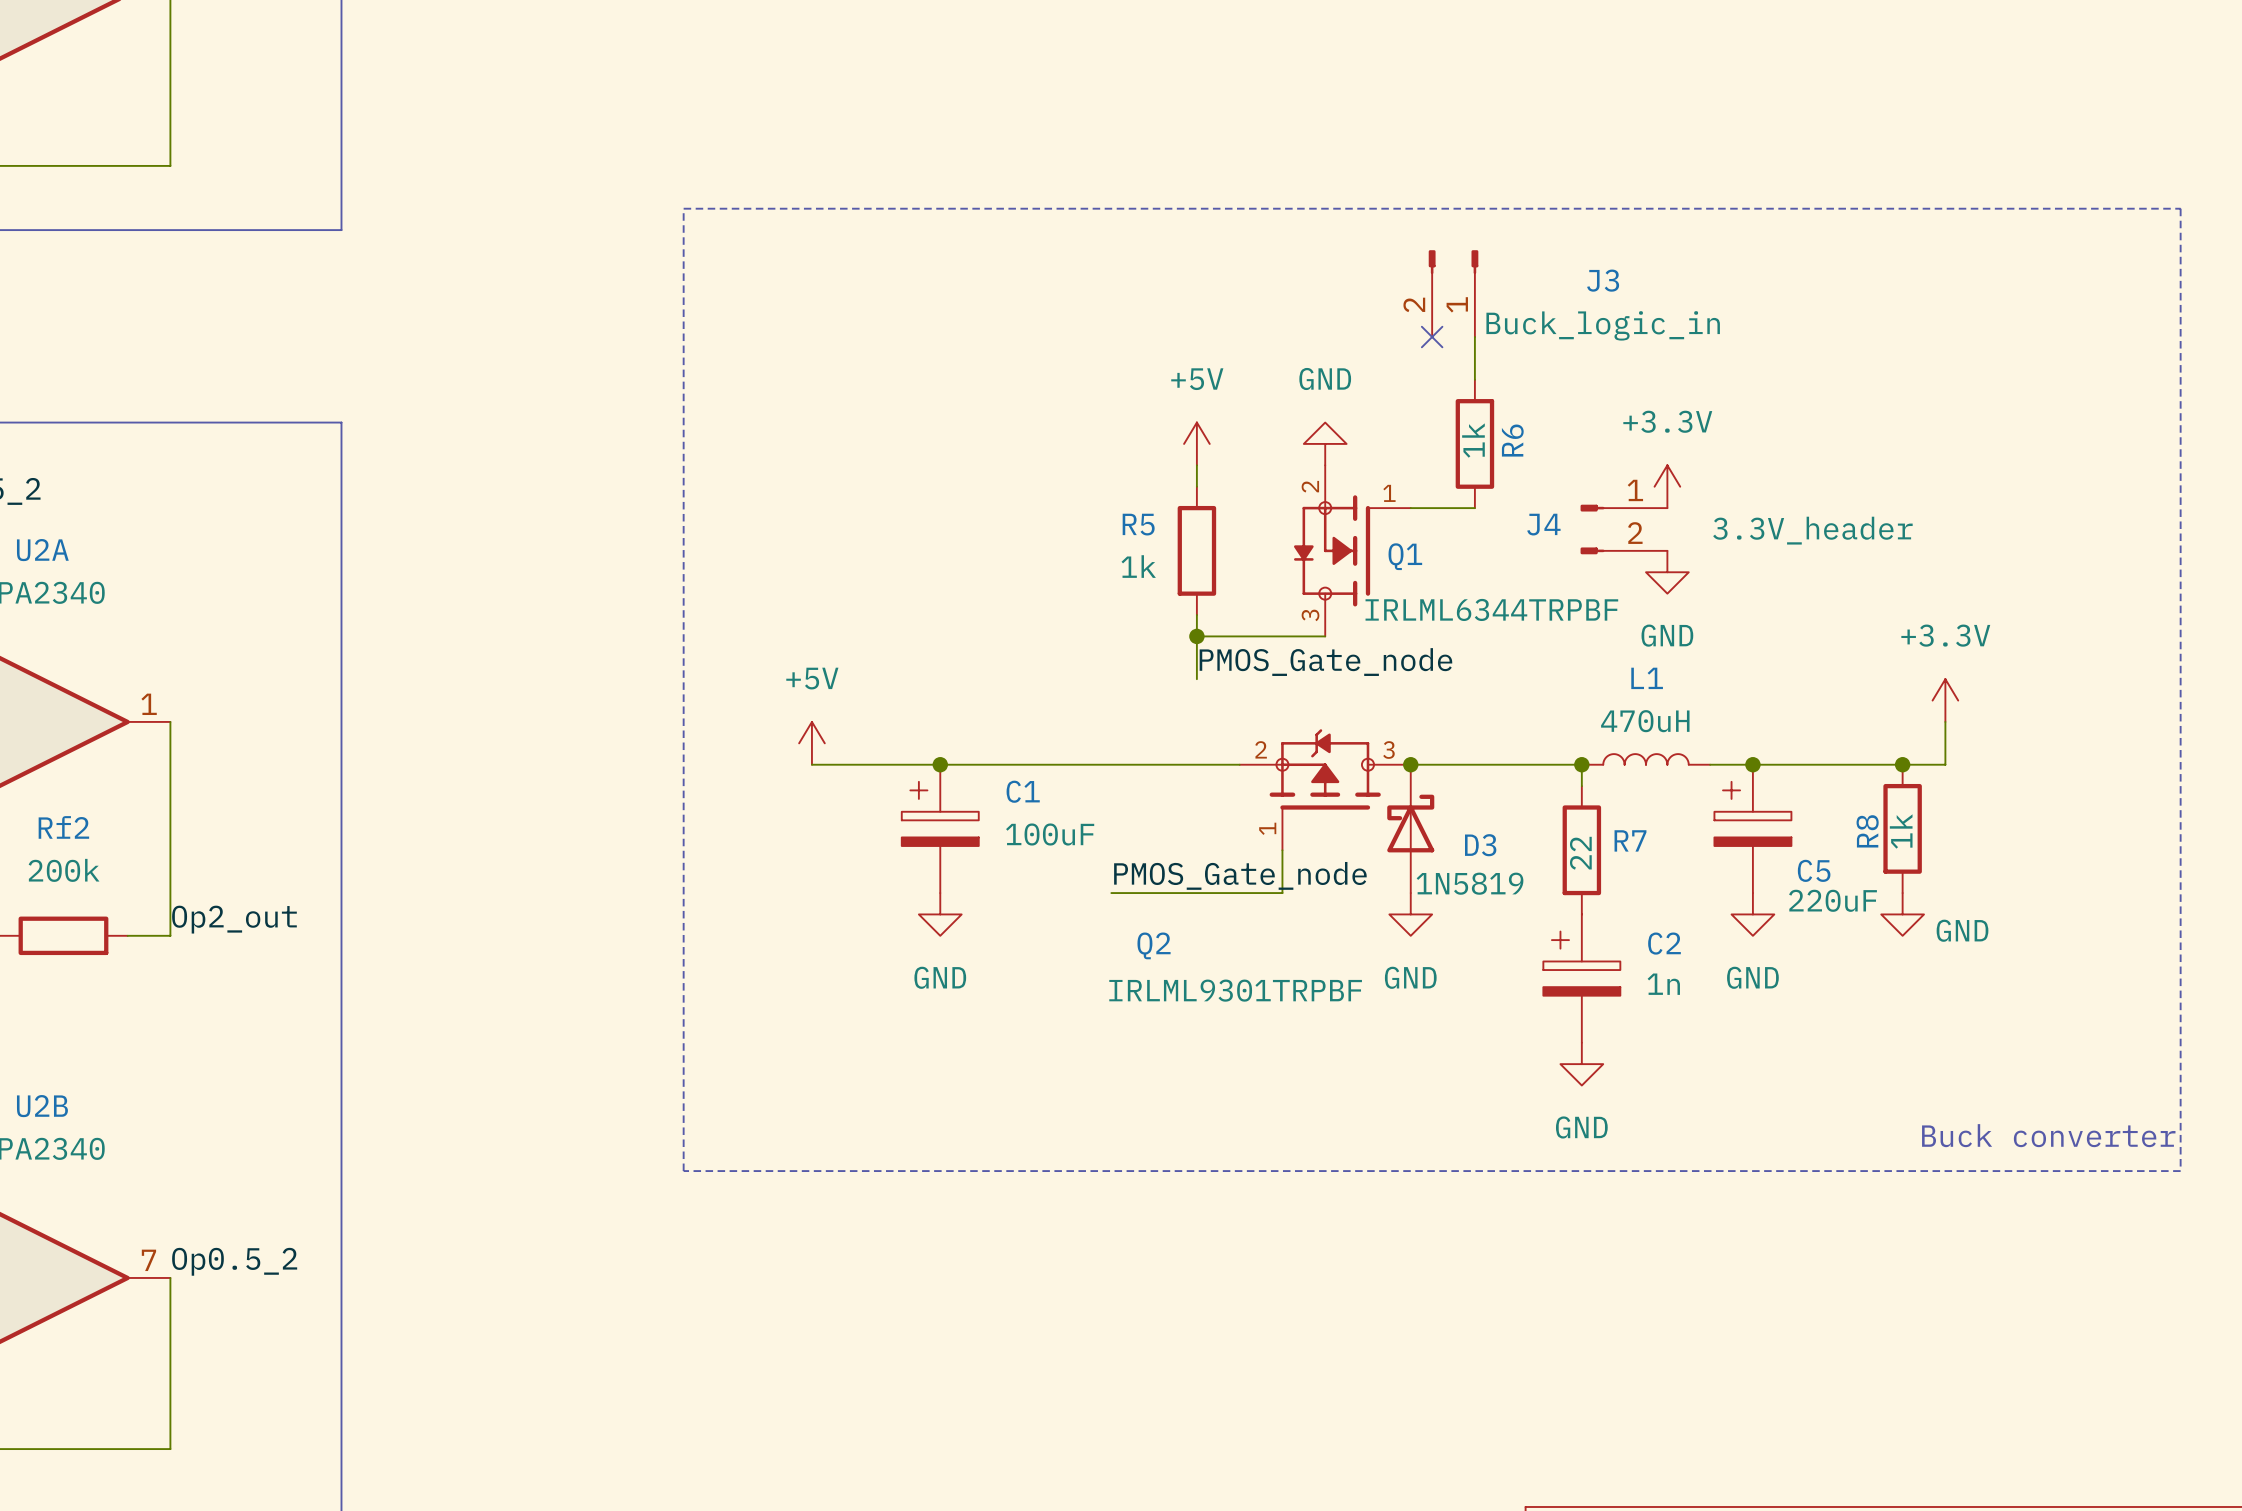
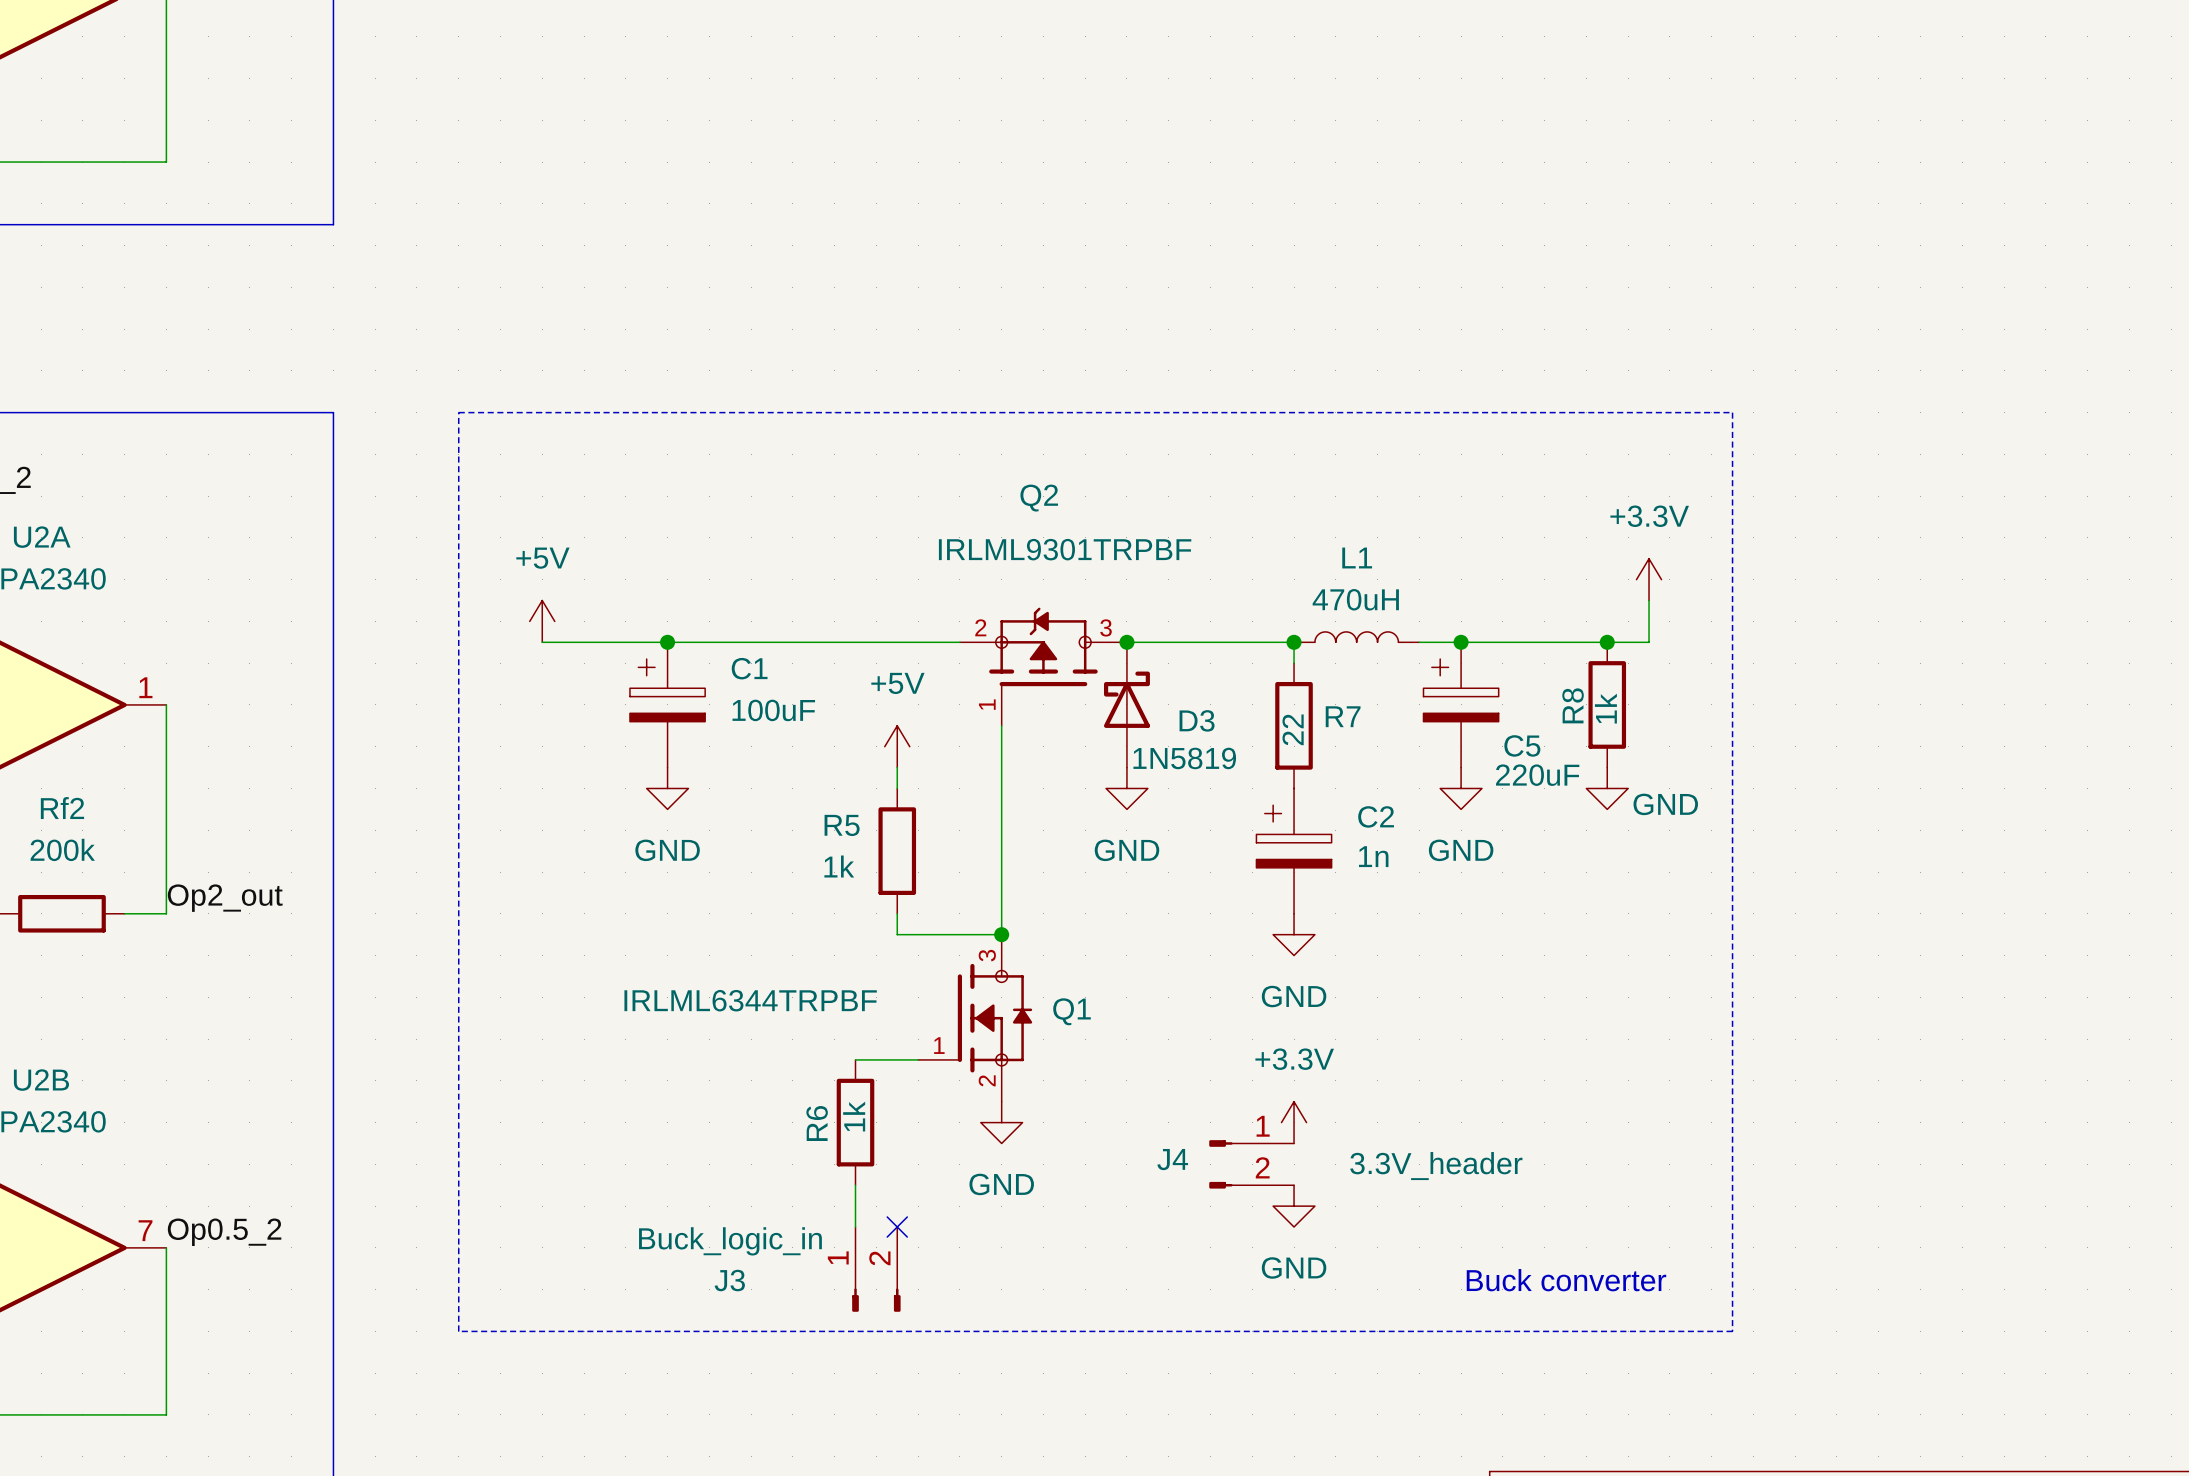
line: (683, 208) (2180, 208) (2180, 1171) (683, 1171) (683, 208) -> none
J3 rotation: 0° (1453, 262) -> 180° (876, 1300)
J3 position: (1453, 293) -> (876, 1269)
no-connect mark: (1432, 337) -> none
wire: (1474, 337) (1474, 379) -> none
line: none -> (458, 412) (1732, 412) (1732, 1331) (458, 1331) (458, 412)
R6 name position: R6 (1512, 440) -> R6 (817, 1123)
power symbol: +5V (1196, 443) -> none
power symbol: GND (1325, 443) -> none
R6 position: (1474, 443) -> (855, 1122)
wire: (1196, 465) (1196, 486) -> none
power symbol position: +3.3V (1667, 486) -> +3.3V (1649, 579)
wire: (1410, 508) (1474, 508) -> none
J4 position: (1623, 529) -> (1251, 1164)
R5 position: (1196, 550) -> (897, 851)
Q1 rotation: 0° (1332, 550) -> 180° (994, 1018)
Q1 position: (1352, 550) -> (975, 1018)
Q1 name position: Q1 (1405, 556) -> Q1 (1072, 1011)
power symbol: GND (1667, 572) -> none
Q1 value position: IRLML6344TRPBF (1491, 609) -> IRLML6344TRPBF (750, 1000)
wire: (1196, 615) (1196, 679) -> none
power symbol: none -> +5V (542, 621)
wire: (1196, 636) (1325, 636) -> none
junction position: (1196, 636) -> (1126, 642)
junction: none -> (667, 642)
junction: none -> (1294, 642)
junction: none -> (1461, 642)
junction: none -> (1607, 642)
label: PMOS_Gate_node (1325, 662) -> none
power symbol: +3.3V (1945, 700) -> none
wire: (1945, 721) (1945, 764) (1710, 764) -> (1649, 600) (1649, 642) (1419, 642)
power symbol position: +5V (811, 743) -> +5V (897, 746)
wire: none -> (1001, 725) (1001, 934) (897, 934) (897, 913)
L1 position: (1646, 759) -> (1356, 637)
wire: (811, 764) (1239, 764) -> (542, 642) (959, 642)
junction: (940, 764) -> none
wire: (1410, 764) (1581, 764) (1581, 786) -> (1126, 642) (1294, 642) (1294, 663)
junction: (1410, 764) -> none
junction: (1581, 764) -> none
junction: (1752, 764) -> none
junction: (1902, 764) -> none
Q2 position: (1325, 789) -> (1043, 666)
power symbol: none -> GND (667, 788)
power symbol: none -> GND (1126, 788)
power symbol: none -> GND (1461, 788)
power symbol: none -> GND (1607, 788)
C1 position: (940, 828) -> (667, 704)
D3 position: (1410, 828) -> (1126, 704)
C5 position: (1752, 828) -> (1461, 704)
R8 position: (1902, 828) -> (1607, 704)
wire: (1282, 850) (1282, 893) (1111, 893) -> none
R7 position: (1581, 850) -> (1294, 725)
label: PMOS_Gate_node (1240, 875) -> none
power symbol: GND (940, 914) -> none
power symbol: GND (1410, 914) -> none
power symbol: GND (1752, 914) -> none
power symbol: GND (1902, 914) -> none
Q2 name position: Q2 (1154, 945) -> Q2 (1039, 498)
junction: none -> (1001, 934)
power symbol: none -> GND (1294, 934)
C2 position: (1581, 978) -> (1294, 851)
Q2 value position: IRLML9301TRPBF (1235, 990) -> IRLML9301TRPBF (1065, 549)
power symbol: GND (1581, 1064) -> none
wire: none -> (855, 1059) (918, 1059)
text: Buck converter (2048, 1135) -> none
power symbol: none -> GND (1001, 1122)
power symbol: none -> +3.3V (1294, 1122)
wire: none -> (855, 1185) (855, 1227)
power symbol: none -> GND (1294, 1206)
no-connect mark: none -> (897, 1227)
text: none -> Buck converter (1566, 1280)

